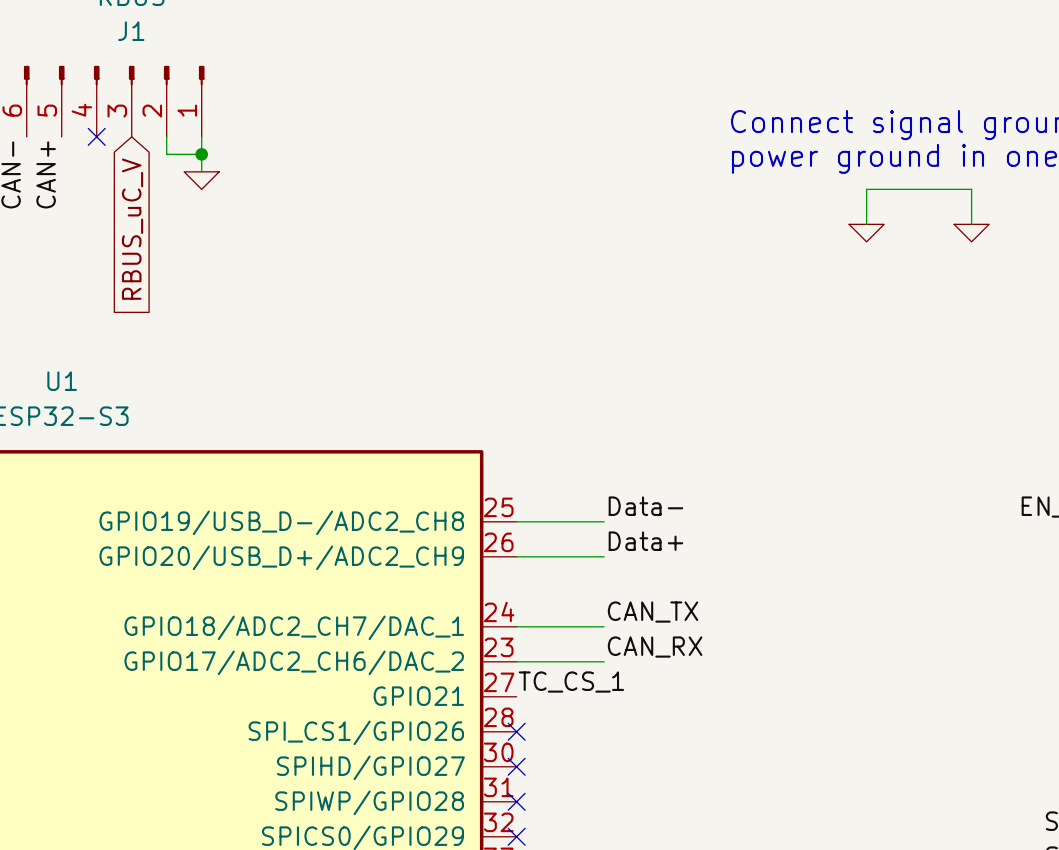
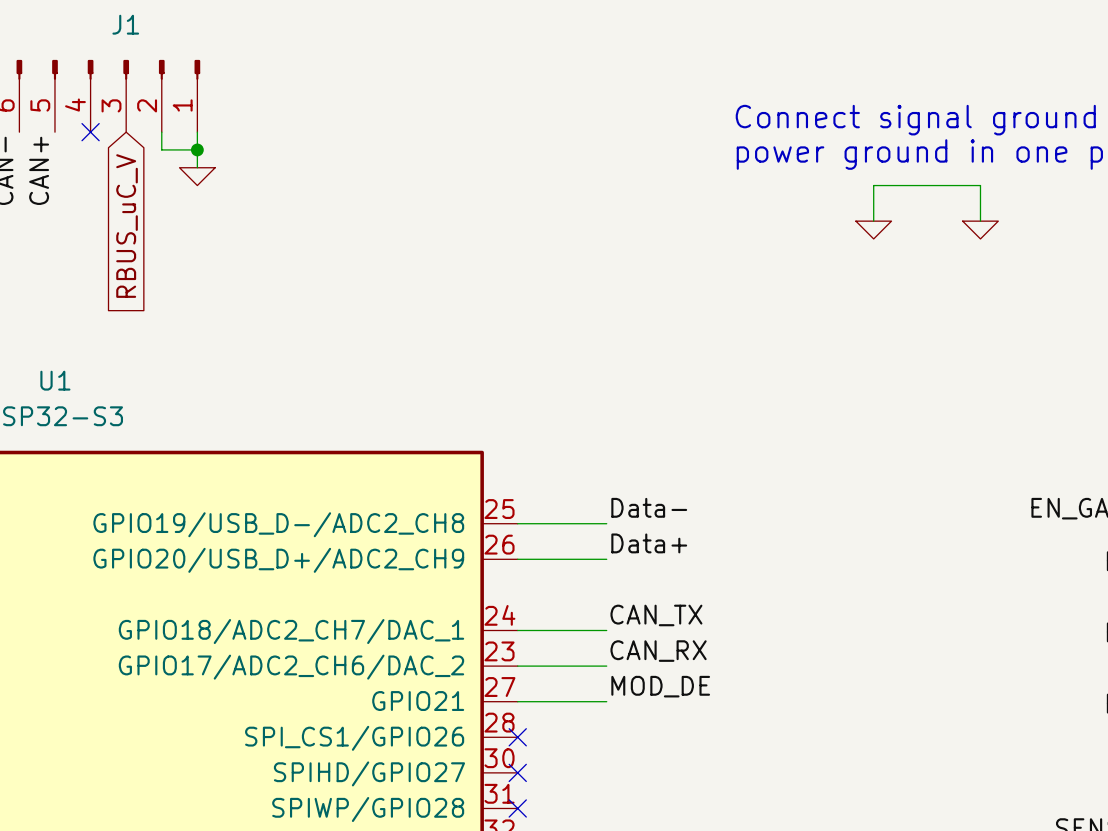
label: TC_CS_1 (571, 682) -> none
label: none -> MOD_DE (660, 686)
wire: none -> (517, 701) (606, 701)

